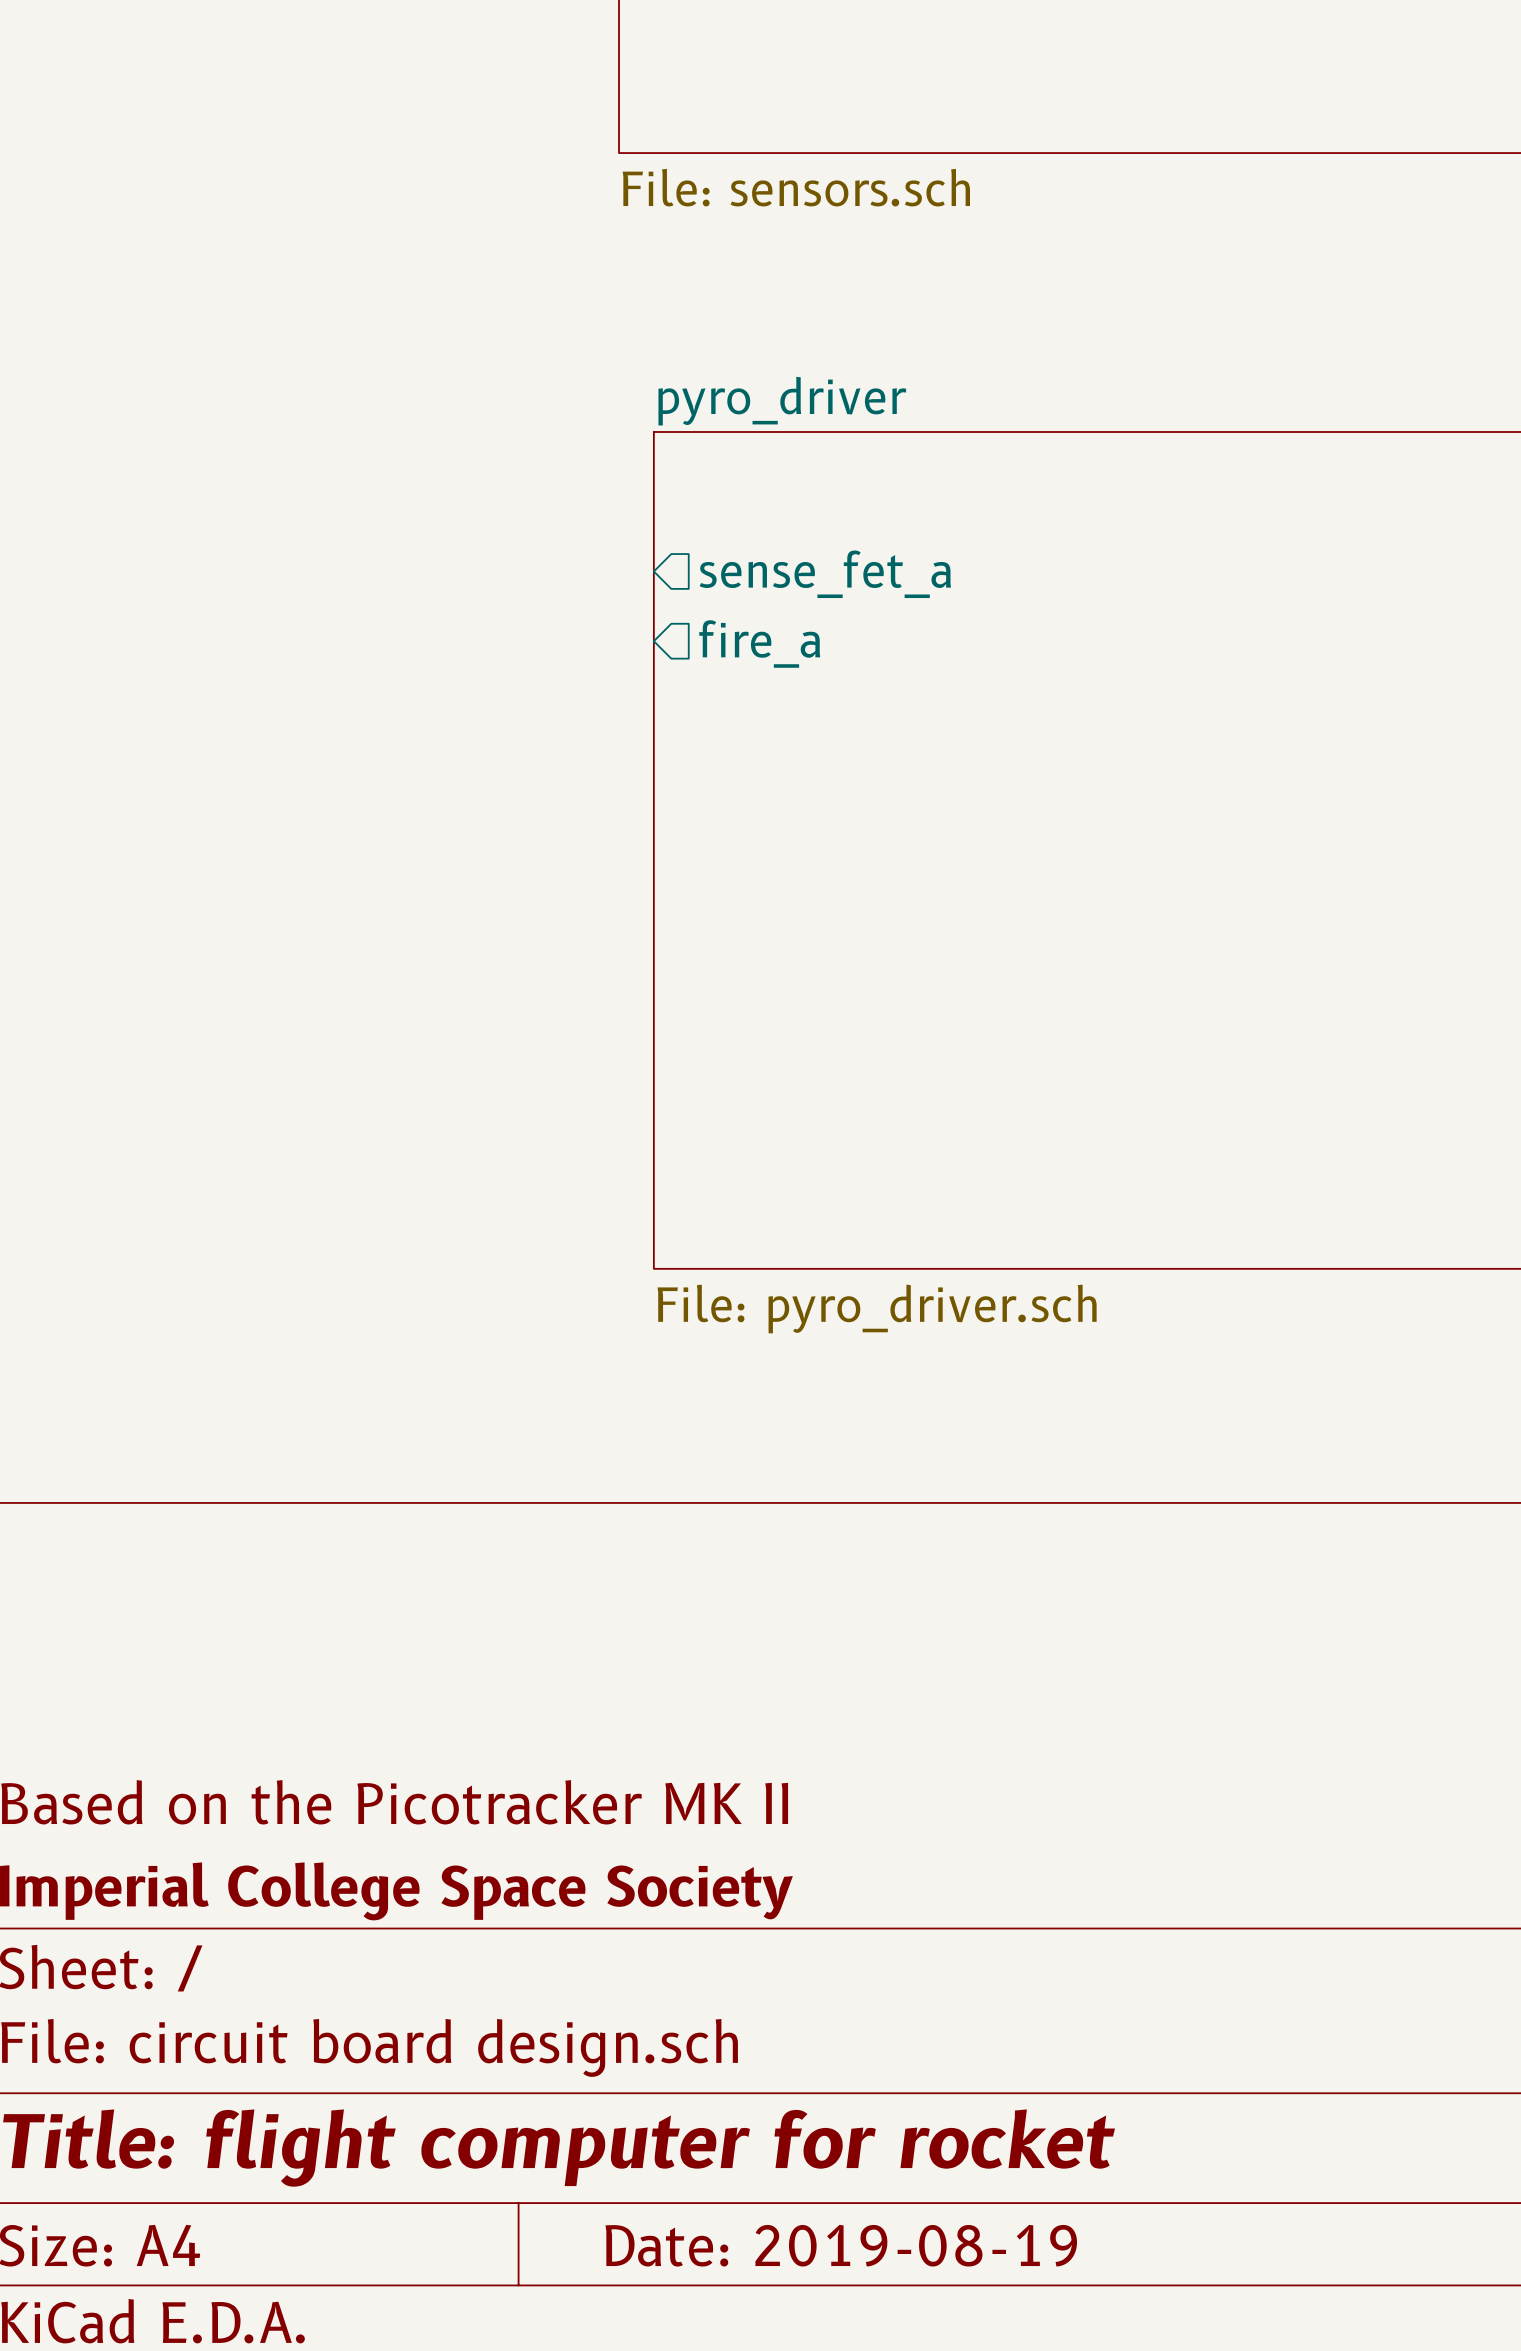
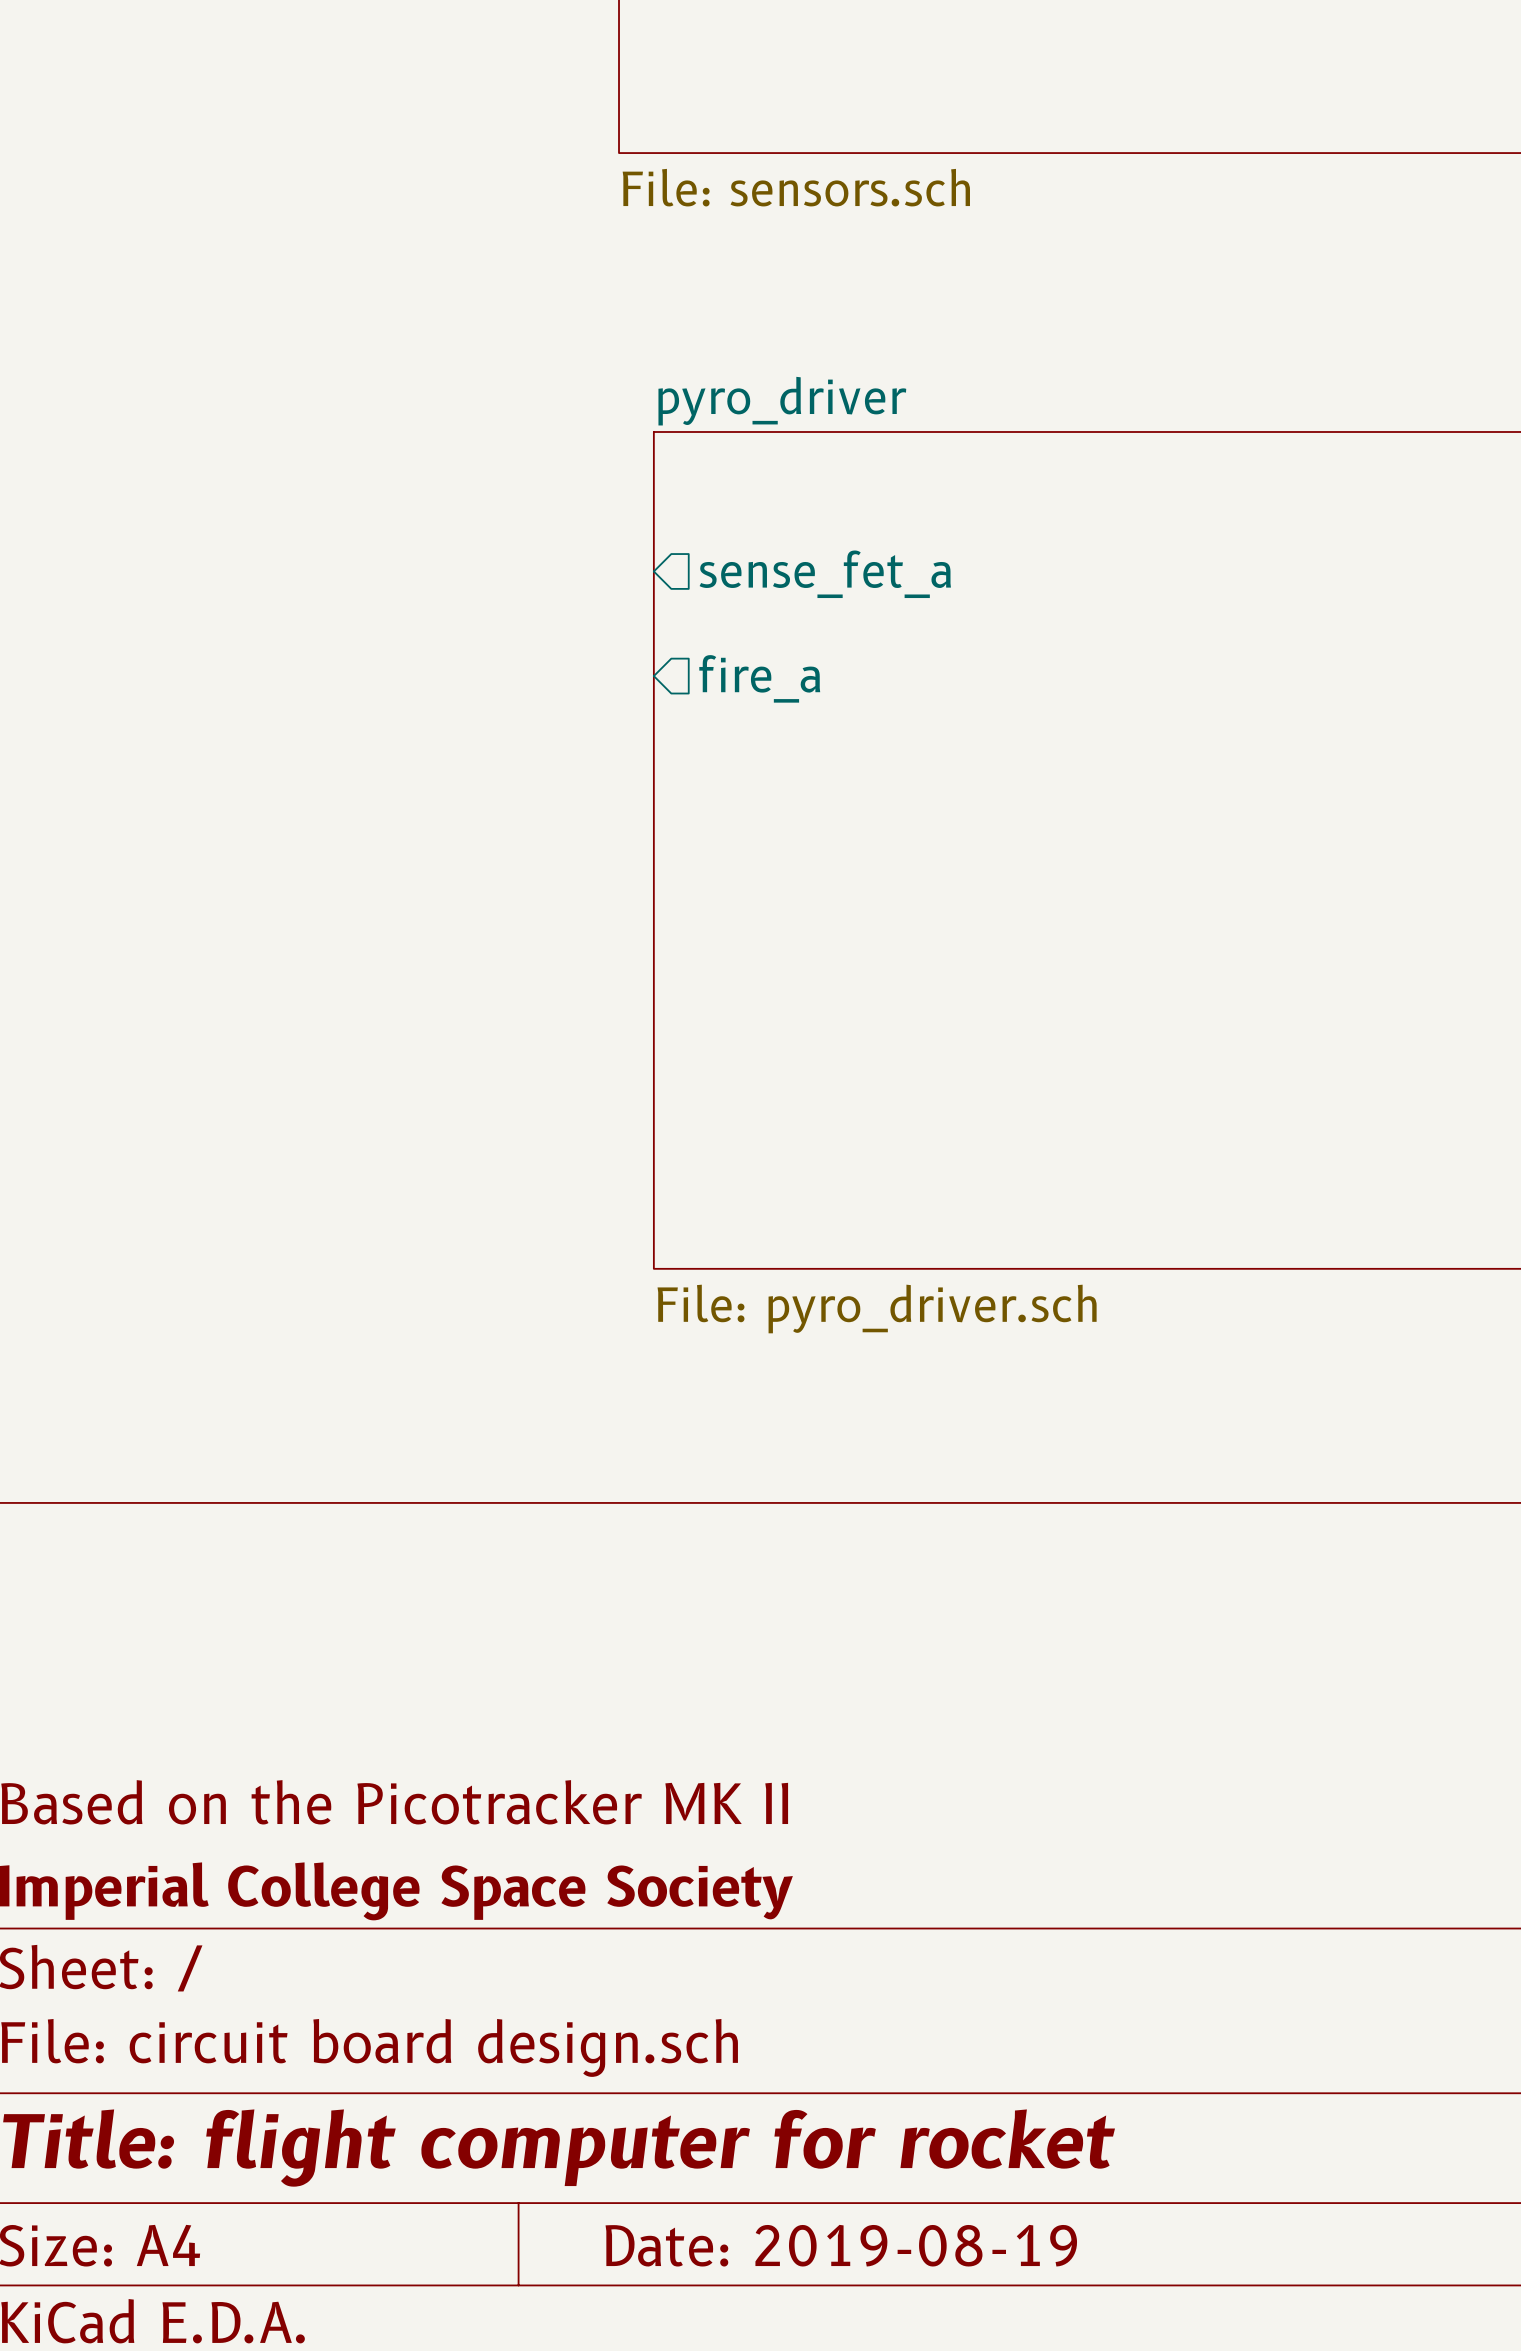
sheet pin position: fire_a (759, 644) -> fire_a (759, 678)

